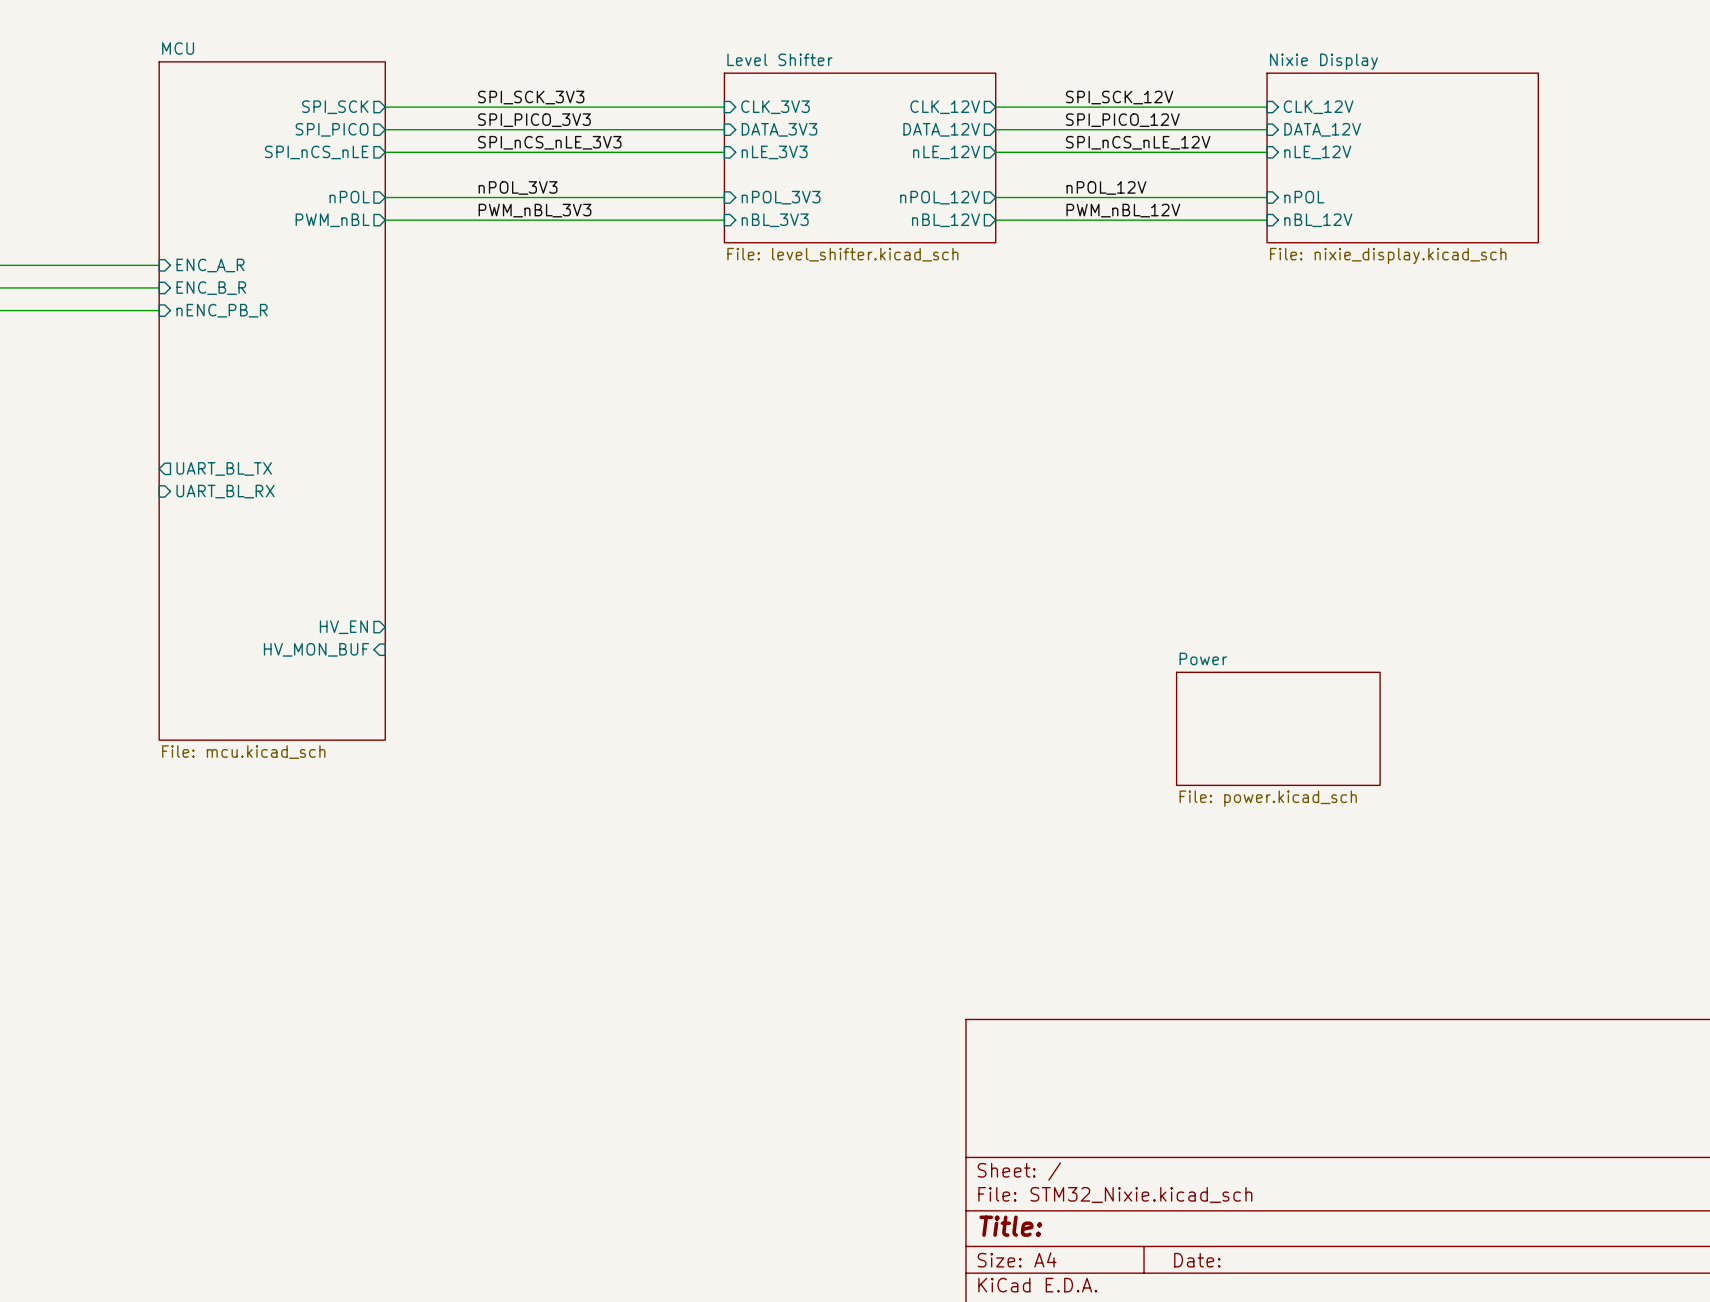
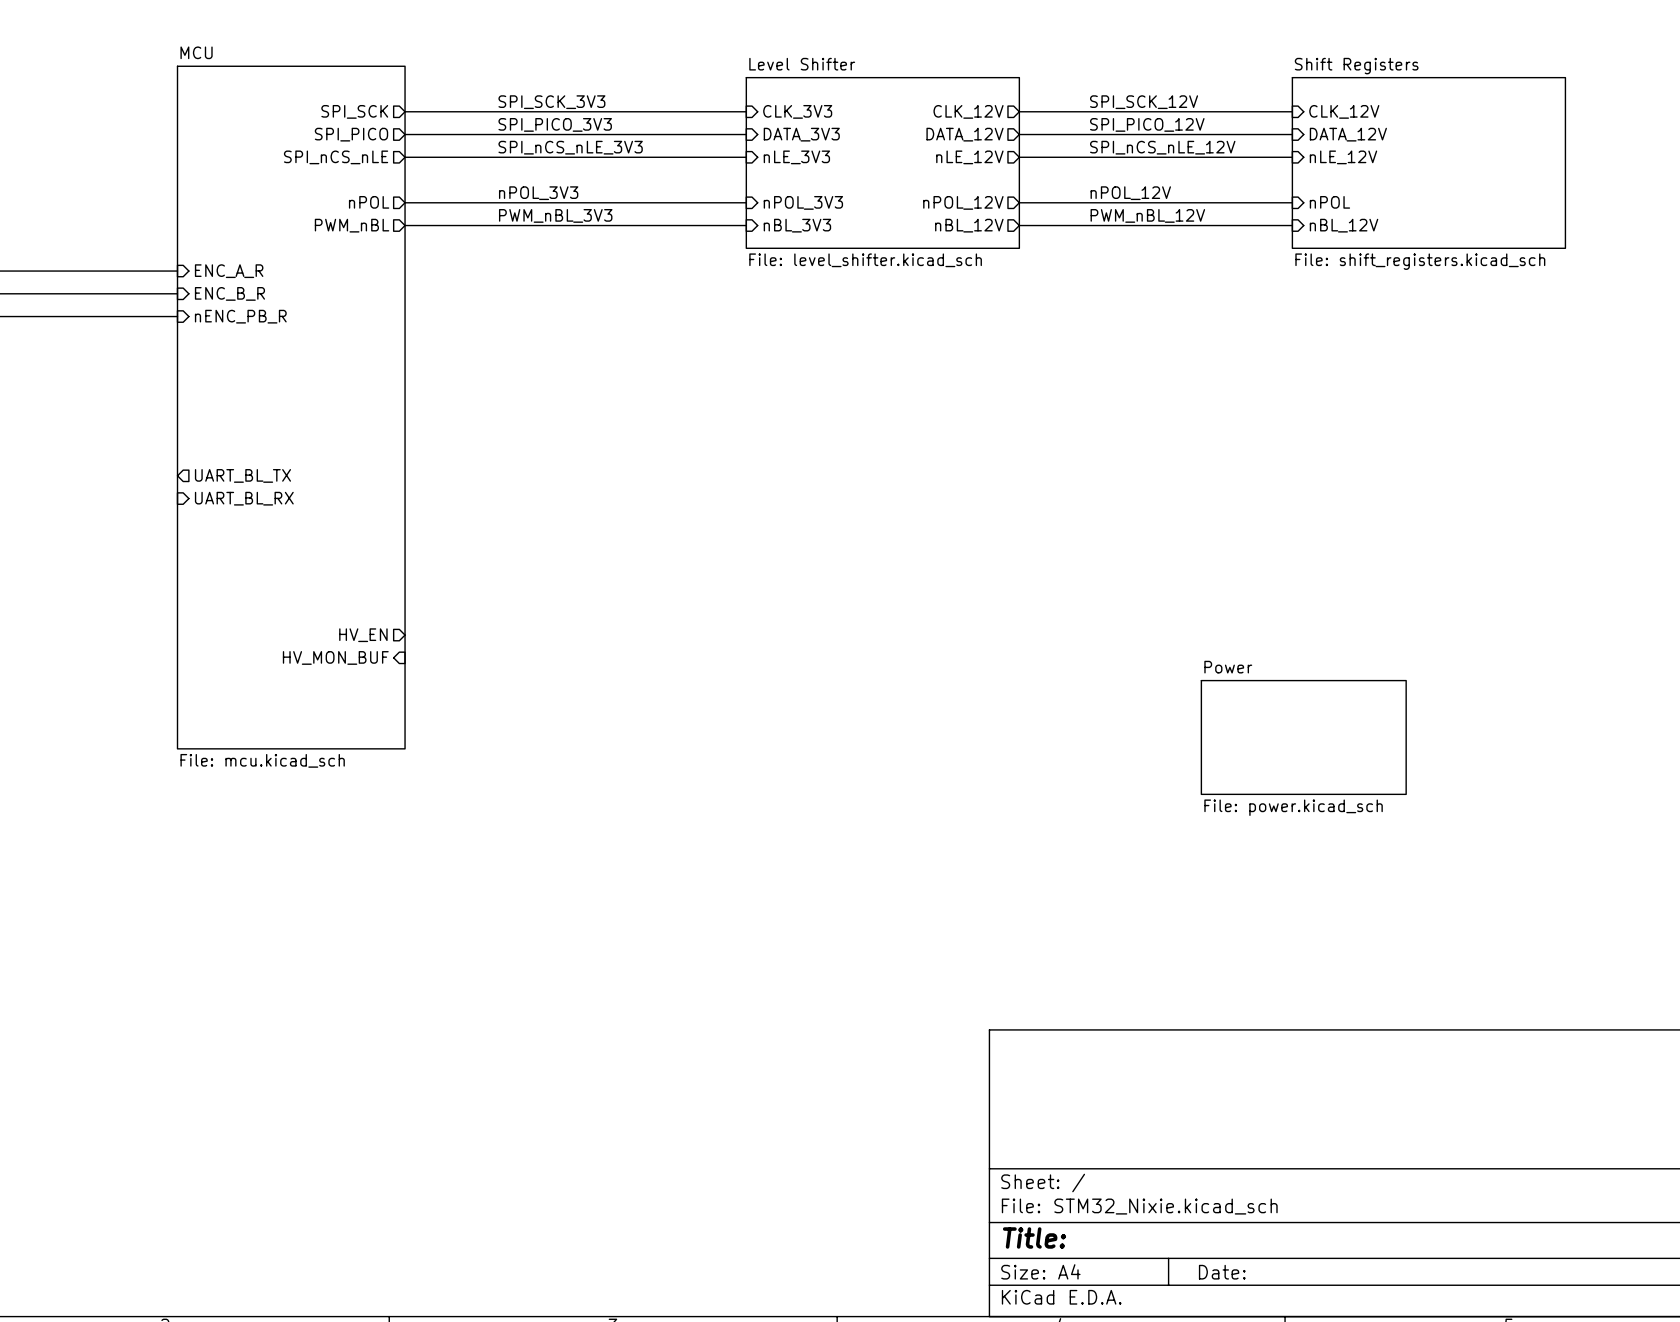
sheet Nixie Display name: Nixie Display (1323, 61) -> Shift Registers (1356, 66)
sheet Nixie Display value: File: nixie_display.kicad_sch (1388, 256) -> File: shift_registers.kicad_sch (1420, 261)

